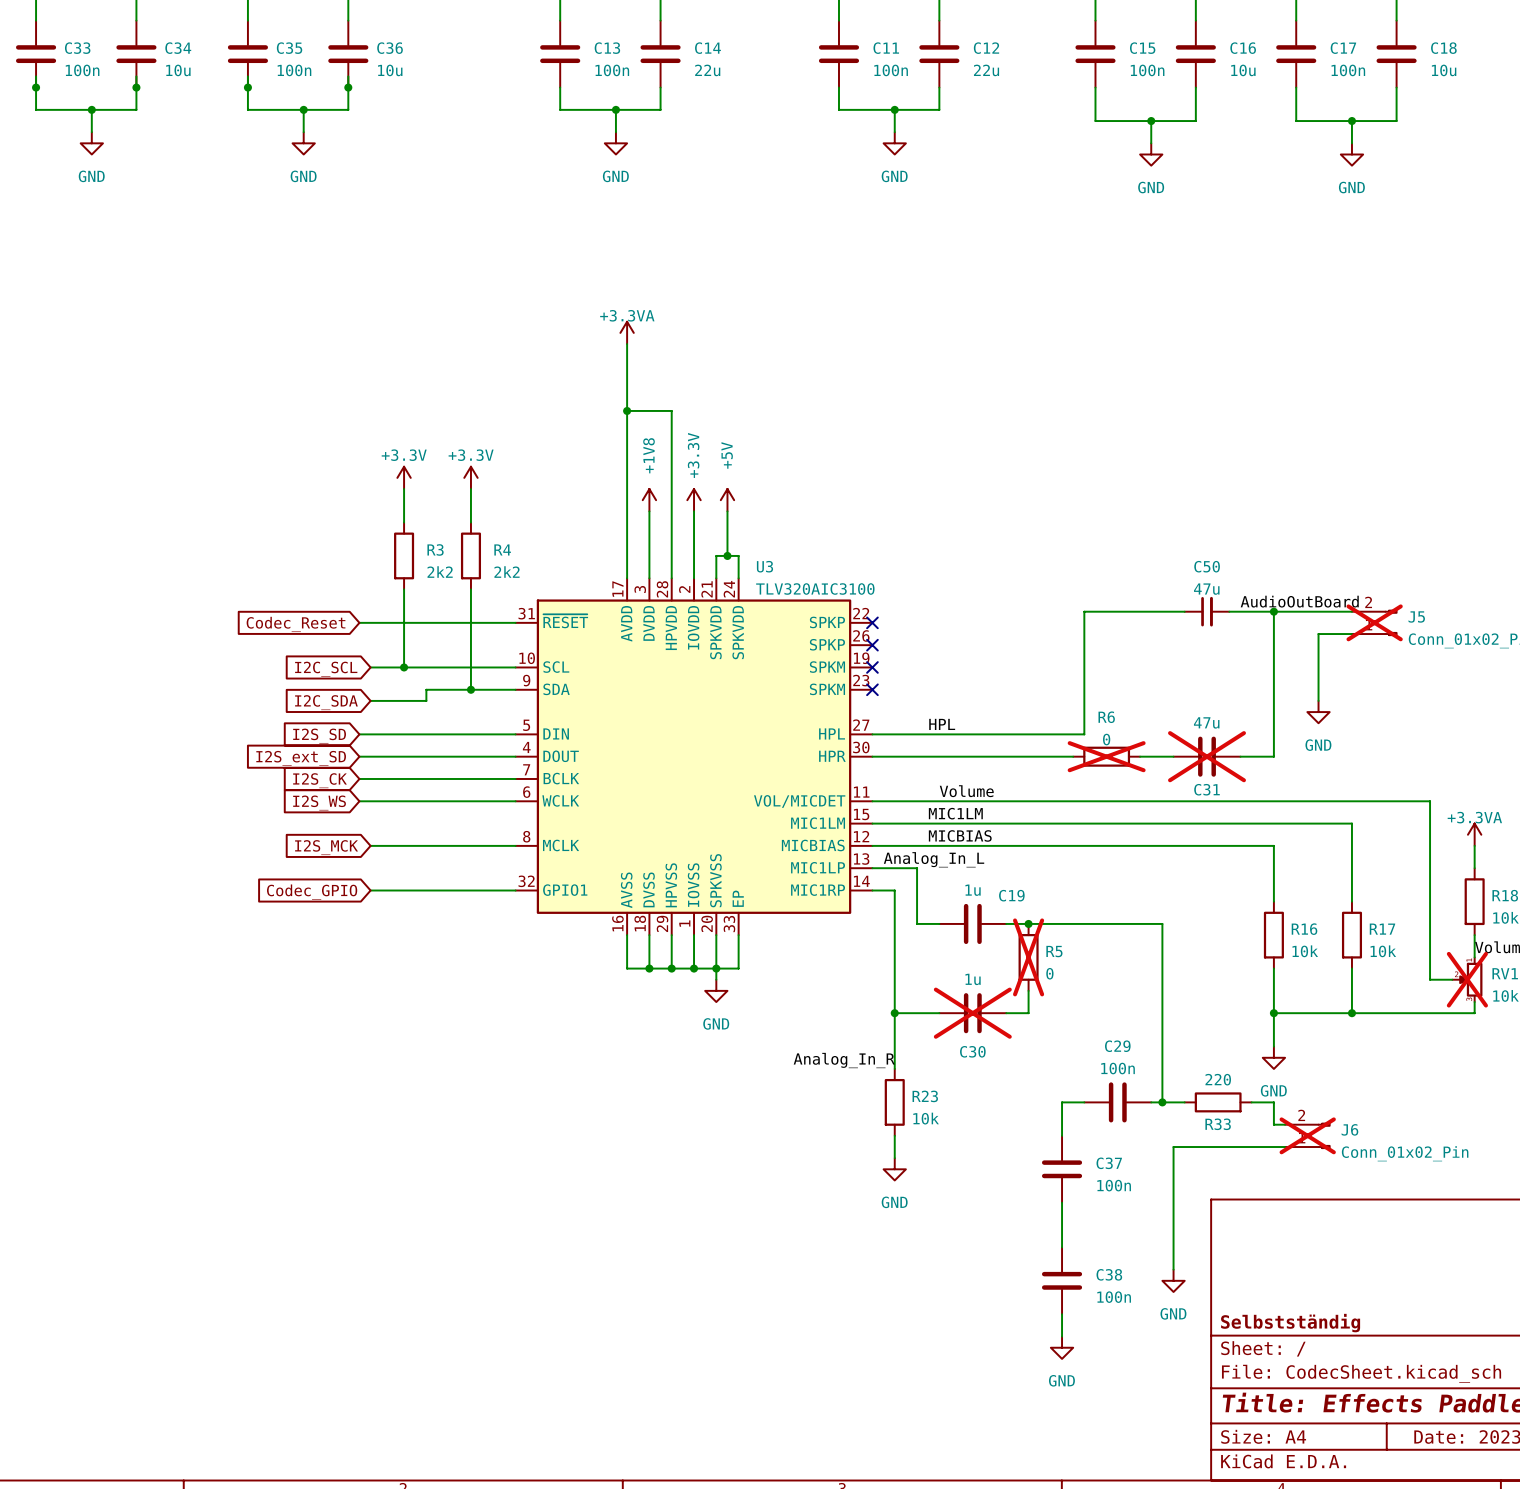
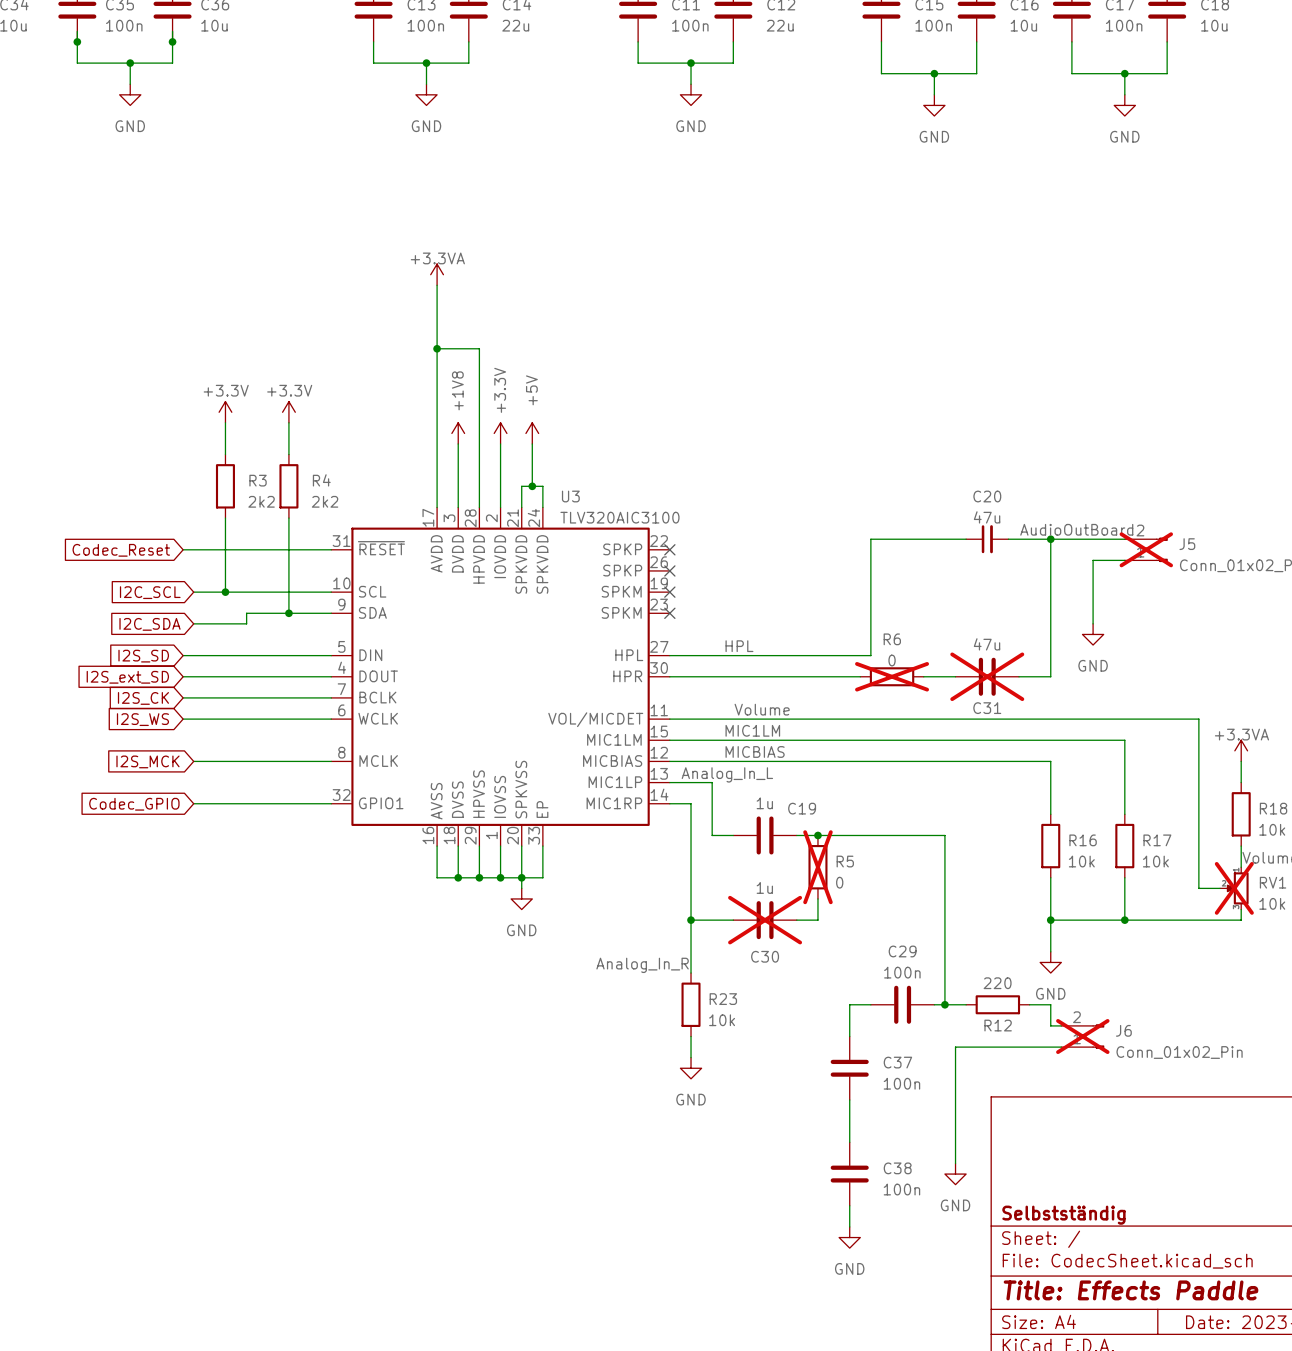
C50 name: C50 (1207, 566) -> C20 (987, 496)
R33 name: R33 (1218, 1124) -> R12 (998, 1025)

